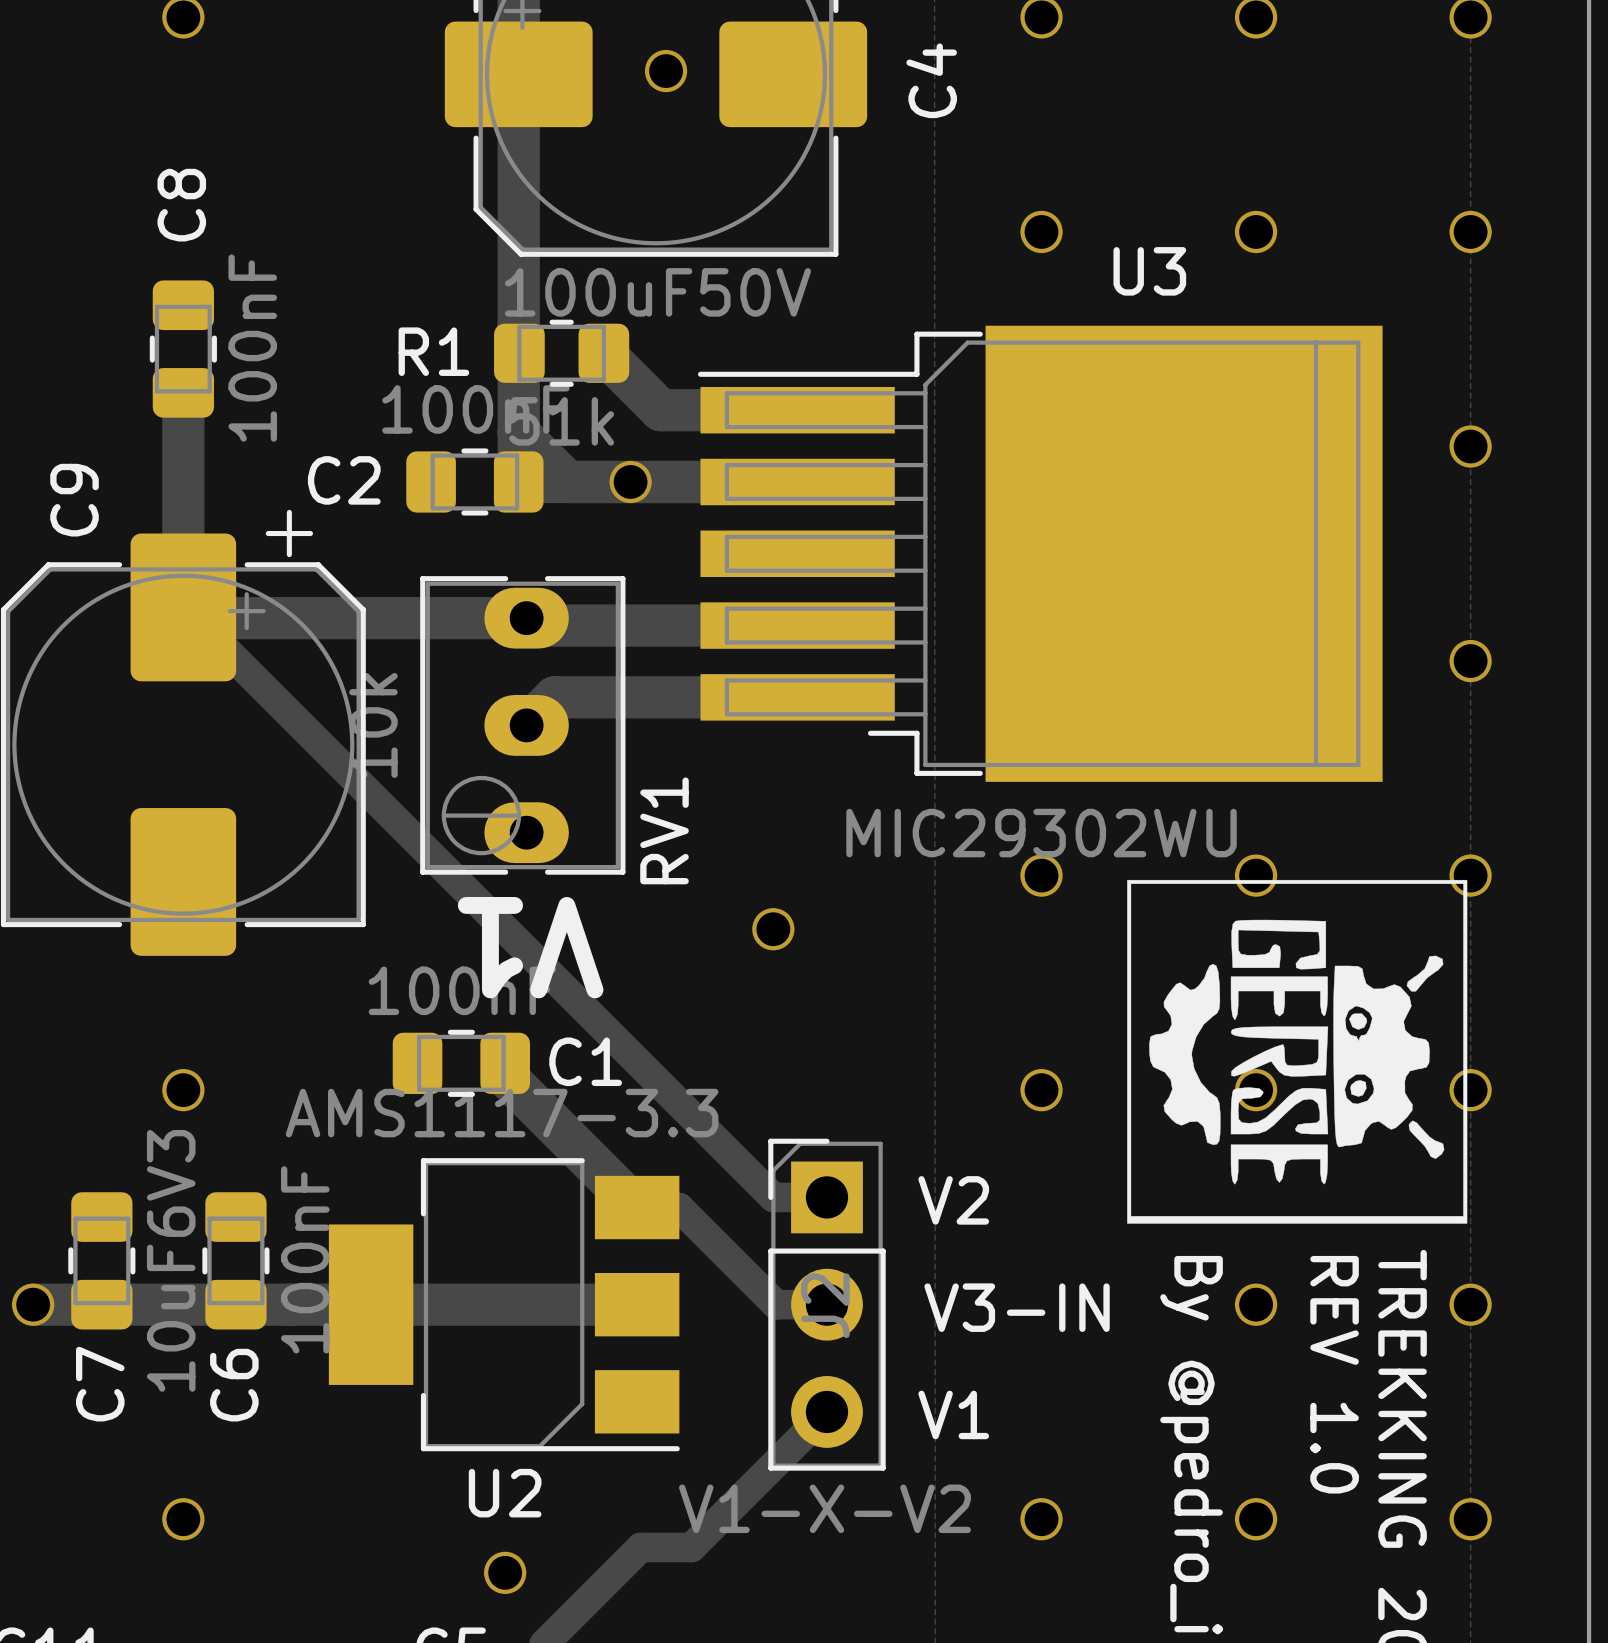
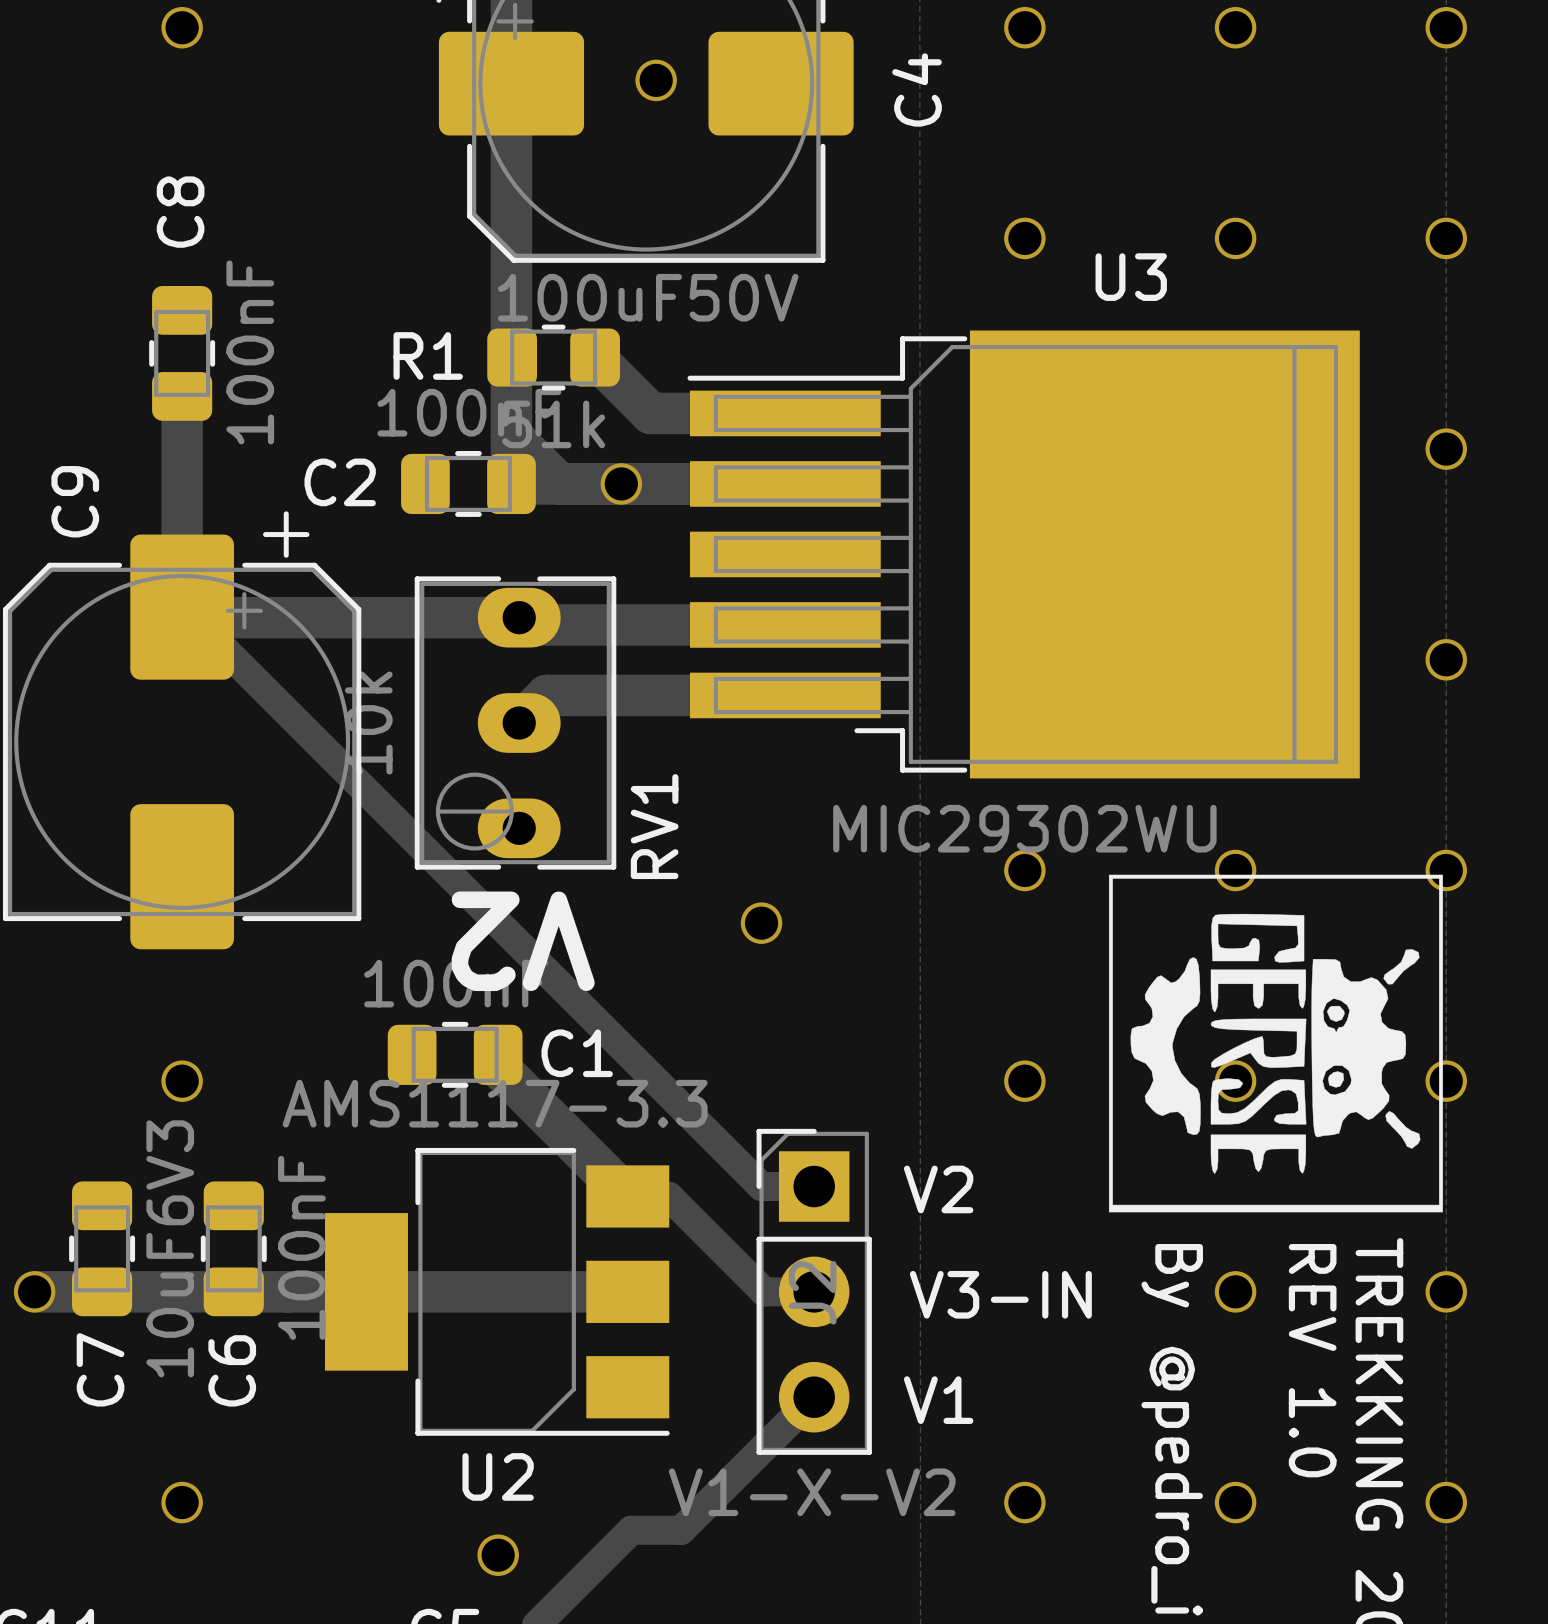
text: V1 (530, 947) -> V2 (523, 941)

